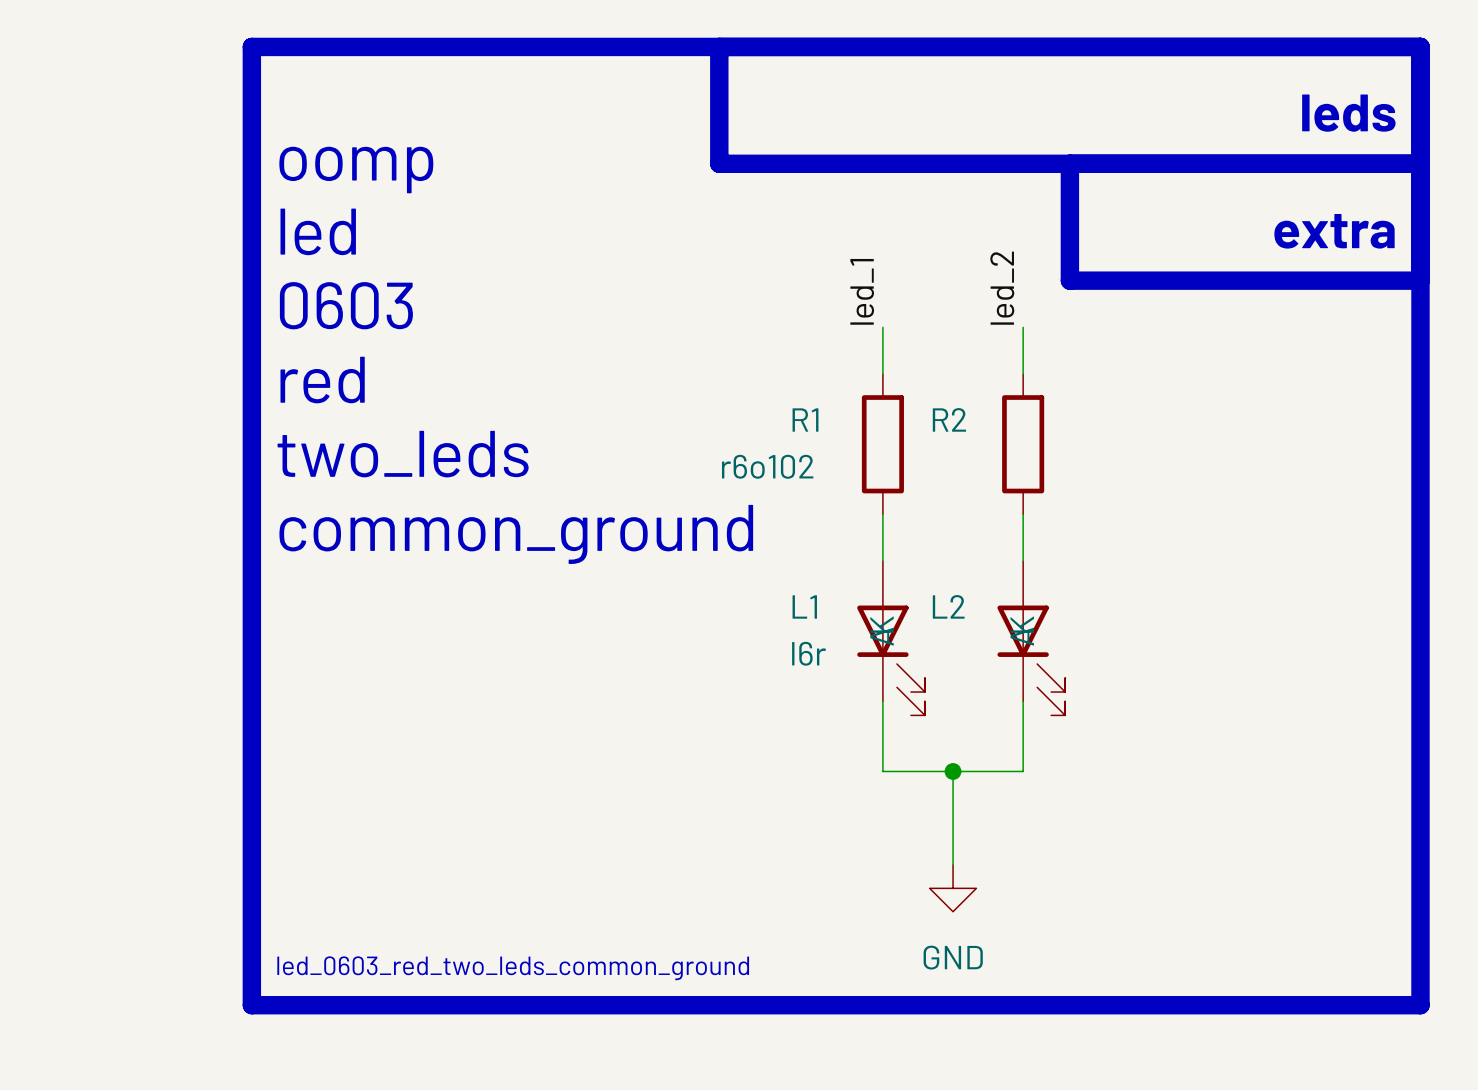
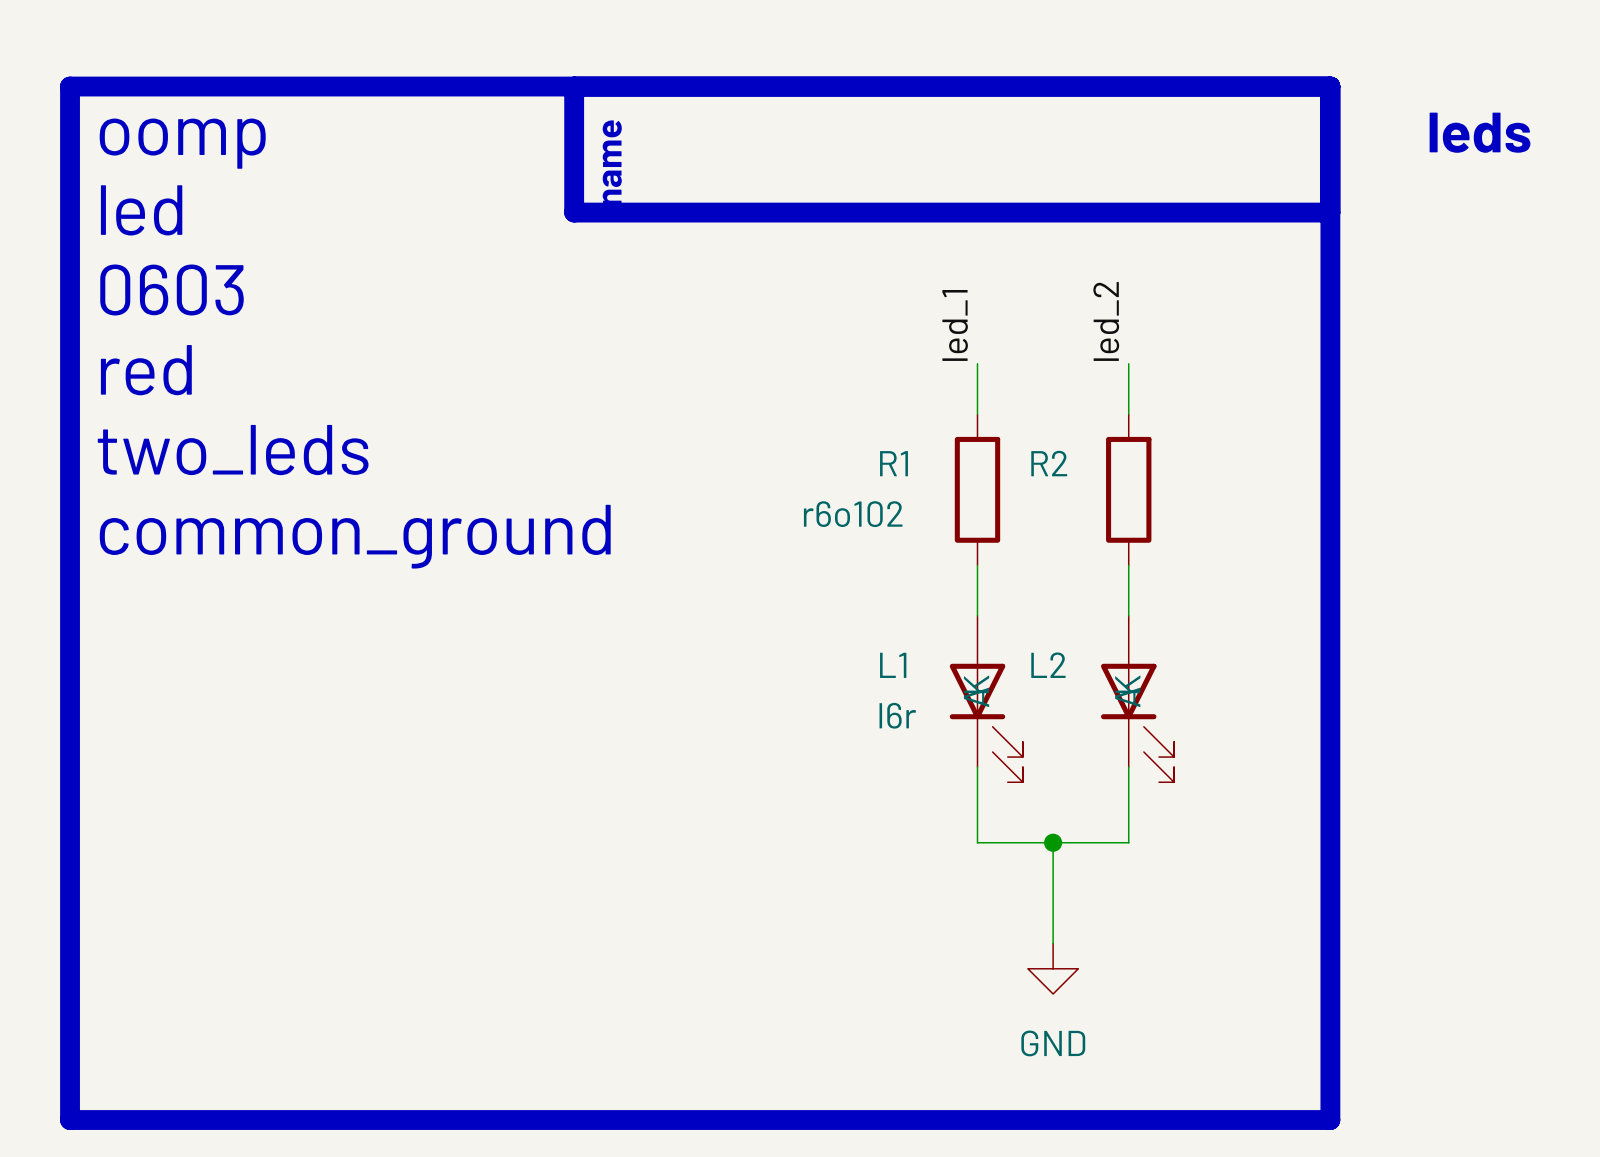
line: (251, 46) (1420, 46) (1420, 1005) (251, 1005) (251, 46) -> (70, 86) (1330, 86) (1330, 1120) (70, 1120) (70, 86)
line: (719, 46) (719, 163) (1420, 163) -> (574, 86) (574, 212) (1330, 212)
text: none -> name (612, 163)
line: (1069, 163) (1069, 280) (1420, 280) -> none
text position: oomp (356, 170) -> oomp (182, 143)
text position: led (318, 231) -> led (141, 210)
text: extra (1334, 231) -> none
text position: 0603 (346, 305) -> 0603 (172, 289)
text position: red (322, 380) -> red (146, 370)
text position: two_leds (403, 454) -> two_leds (233, 450)
text position: common_ground (516, 534) -> common_ground (355, 536)
text: led_0603_red_two_leds_common_ground (513, 968) -> none

